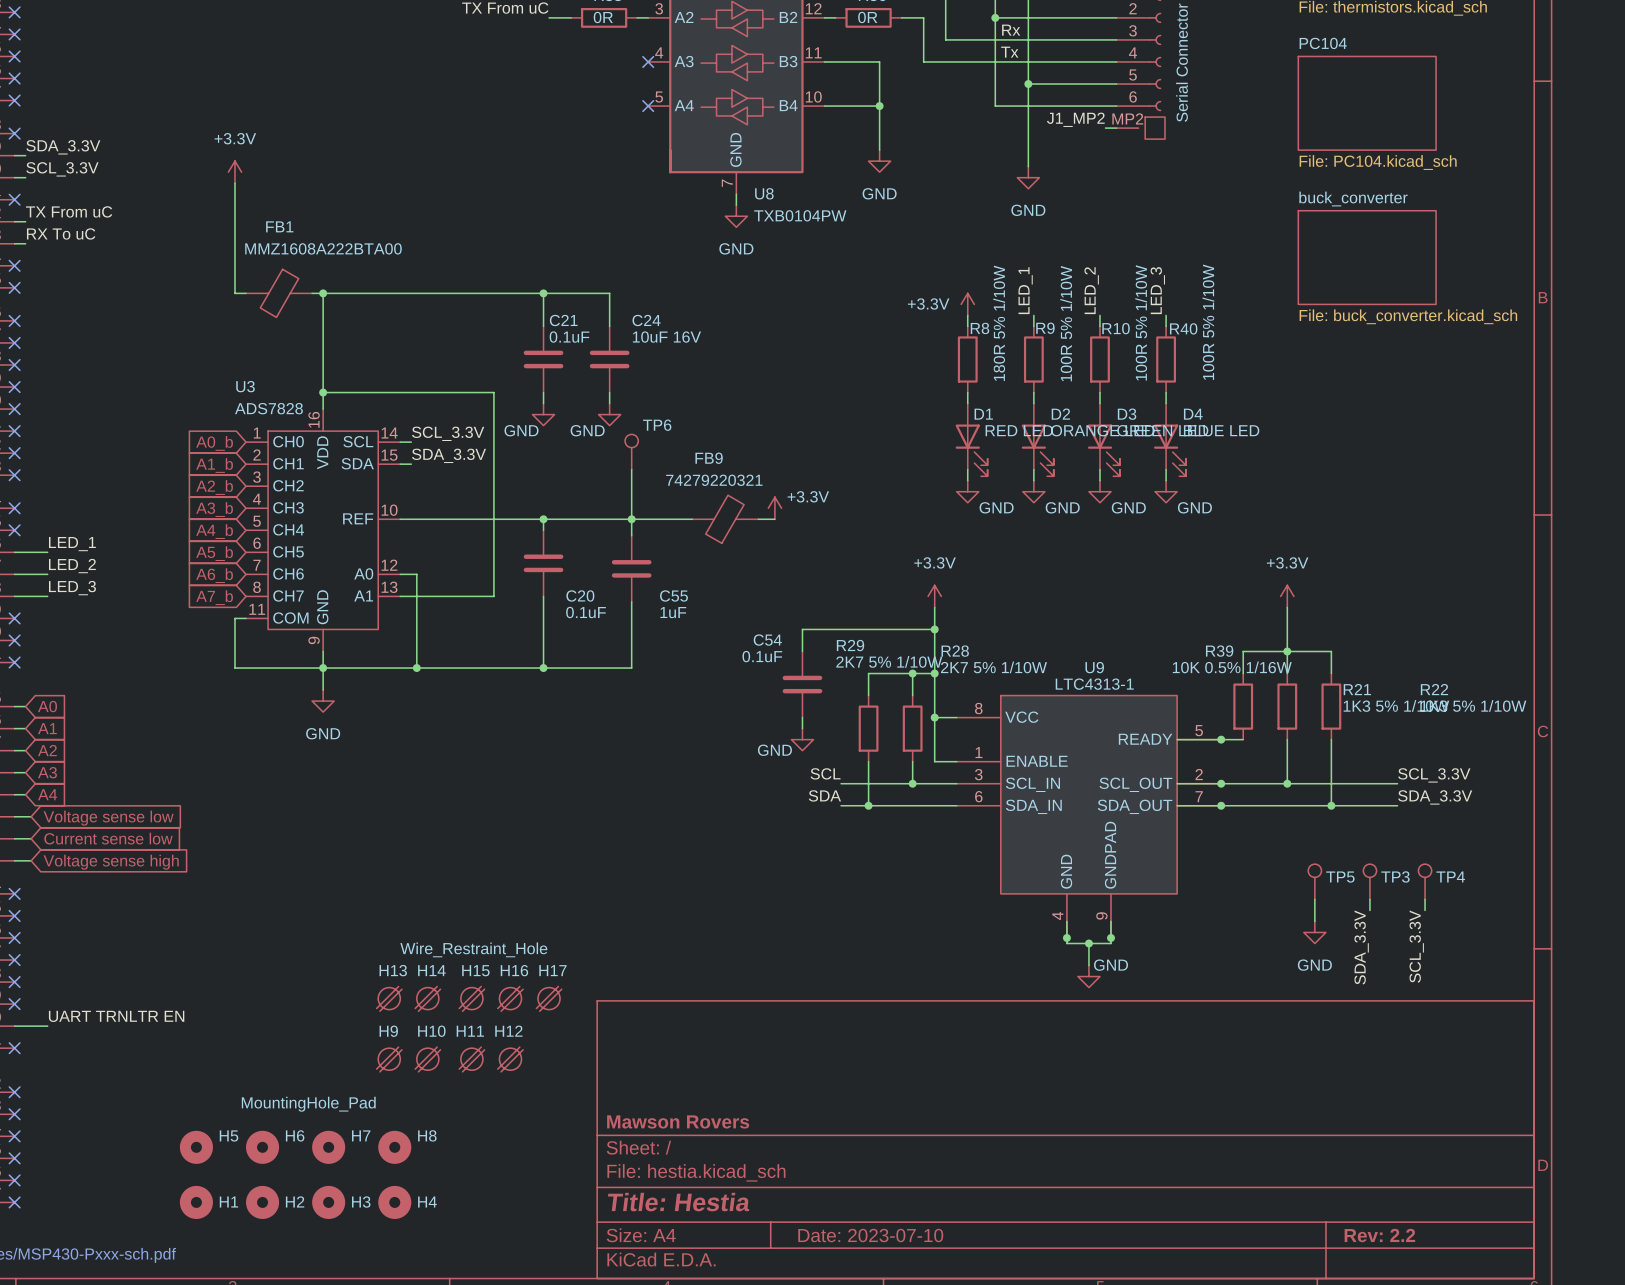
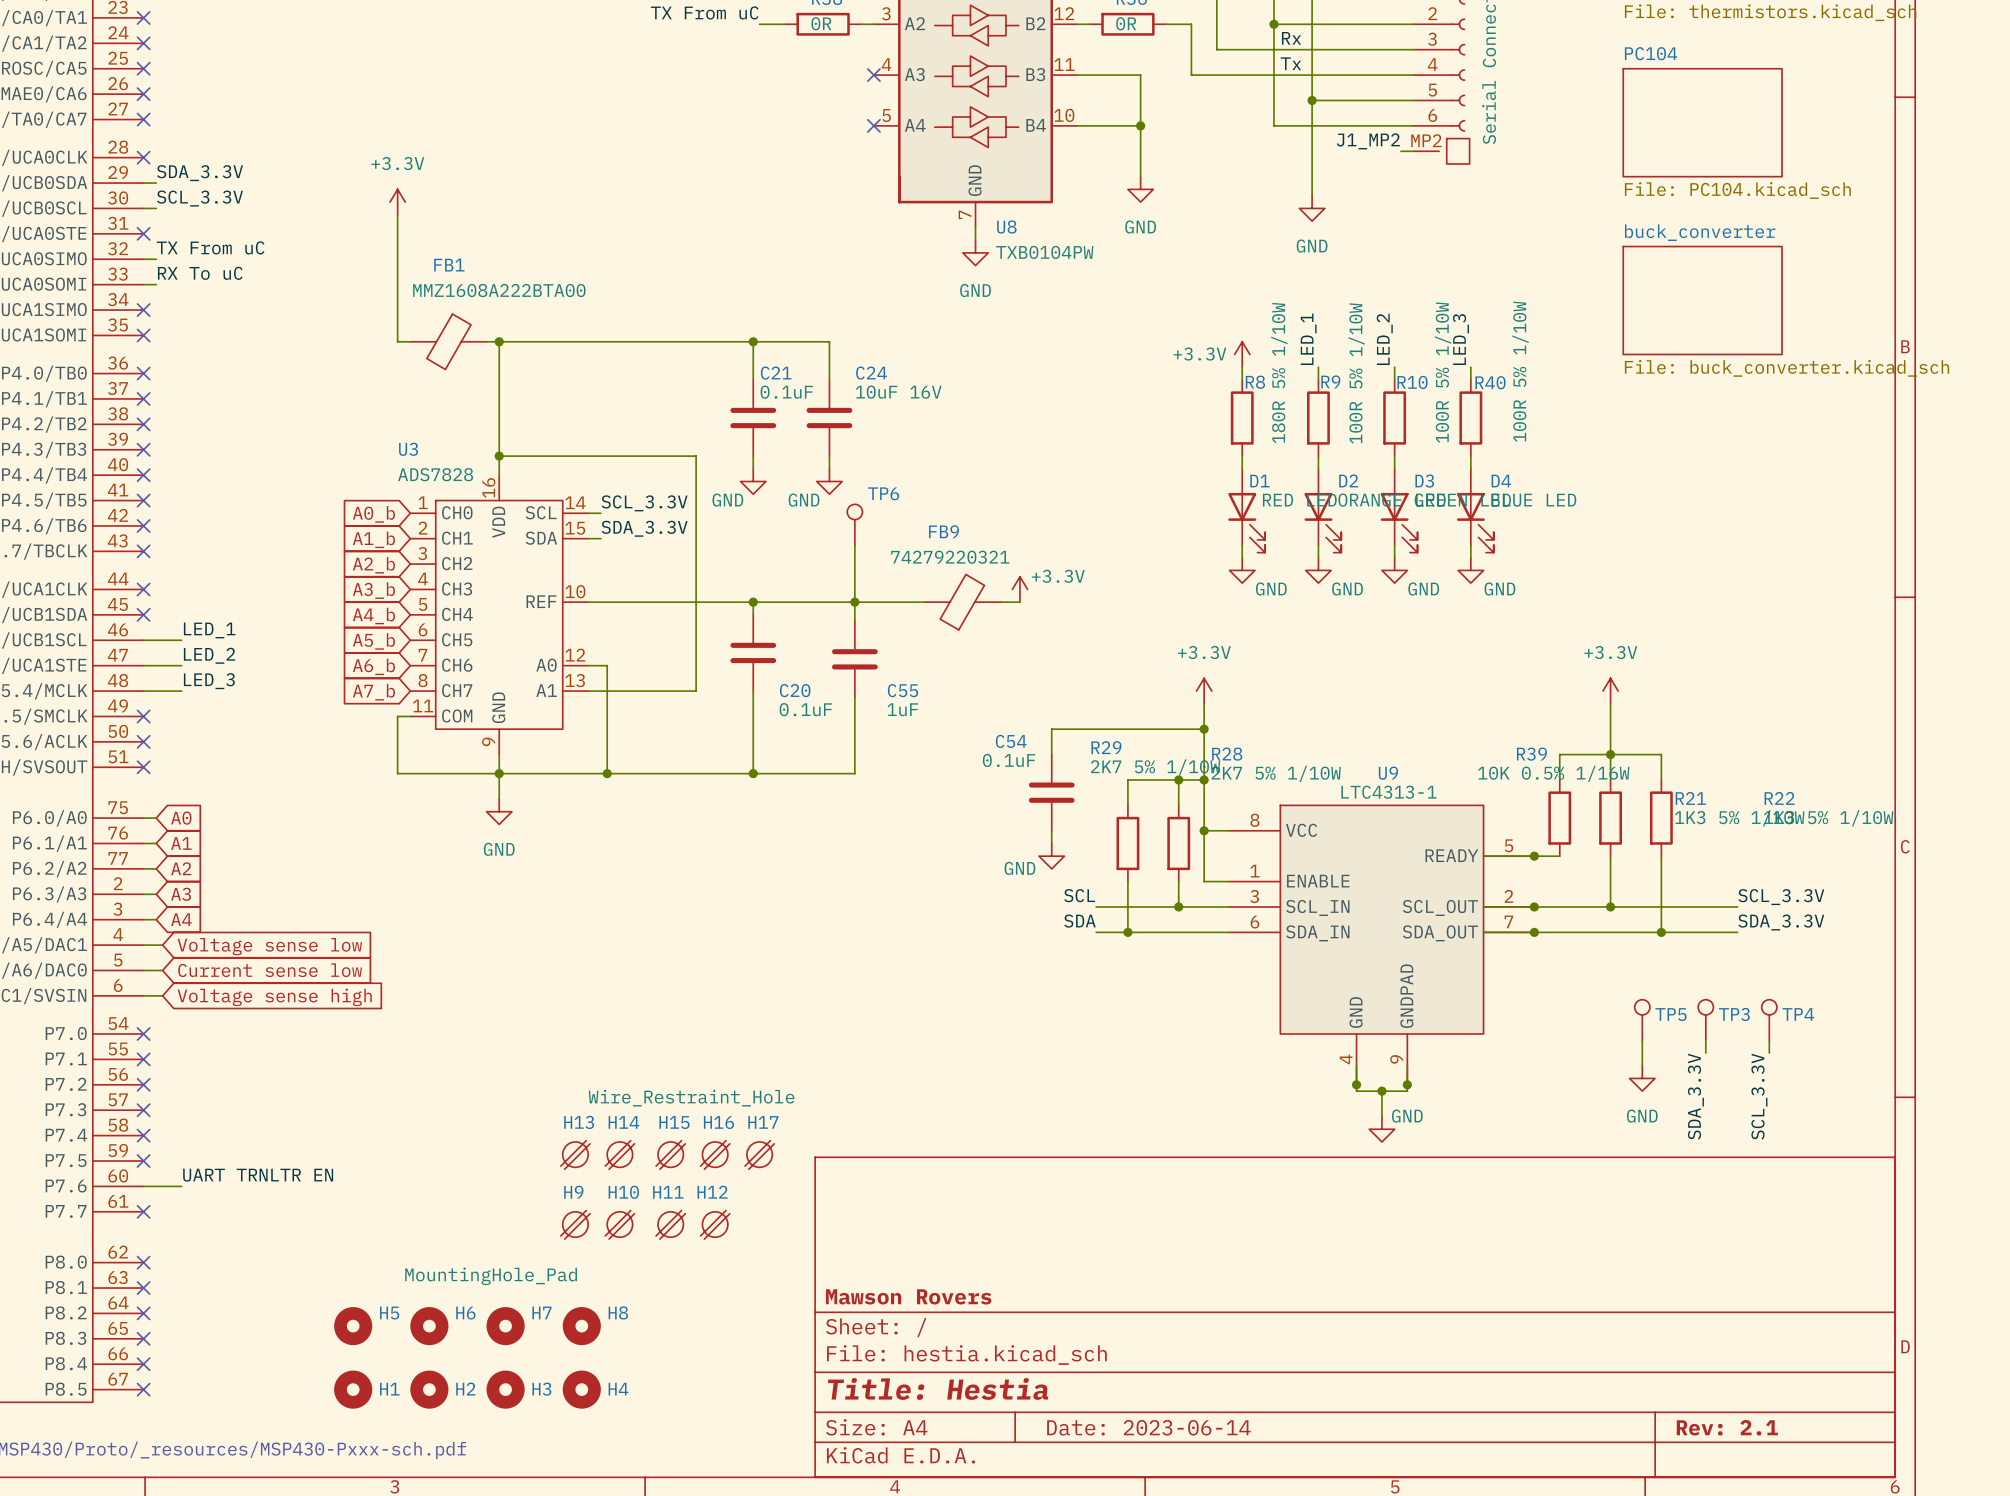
title block: Date: 2023-07-10 (870, 1235) -> Date: 2023-06-14 (1148, 1427)
title block: Rev: 2.2 (1379, 1235) -> Rev: 2.1 (1727, 1427)

